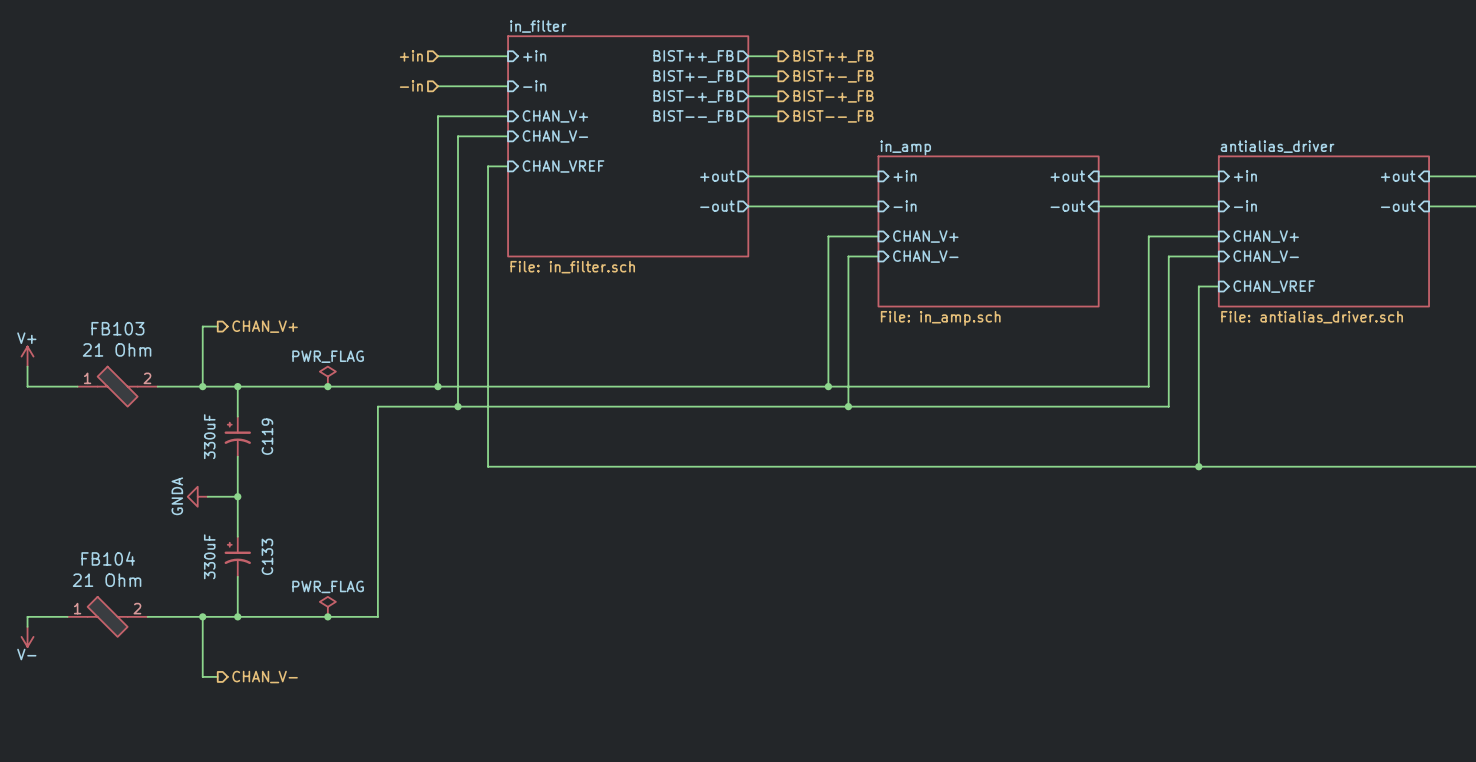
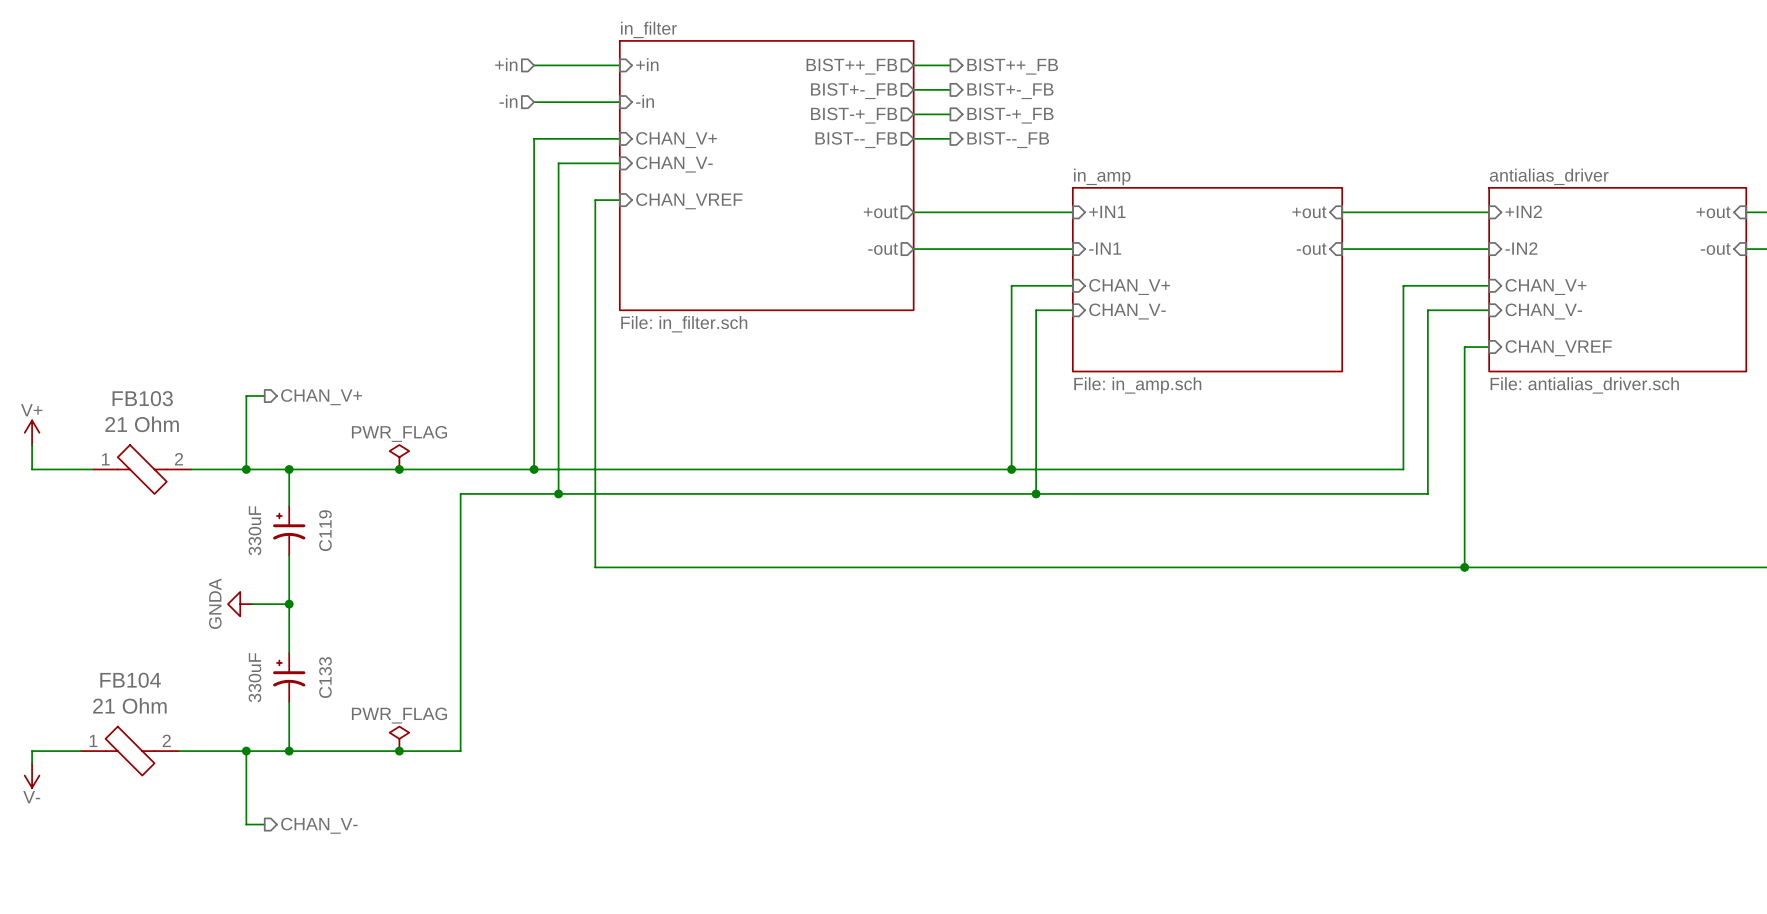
sheet pin: +in (905, 176) -> +IN1 (1107, 211)
sheet pin: +in (1245, 176) -> +IN2 (1523, 211)
sheet pin: -in (905, 206) -> -IN1 (1105, 248)
sheet pin: -in (1245, 206) -> -IN2 (1521, 248)

